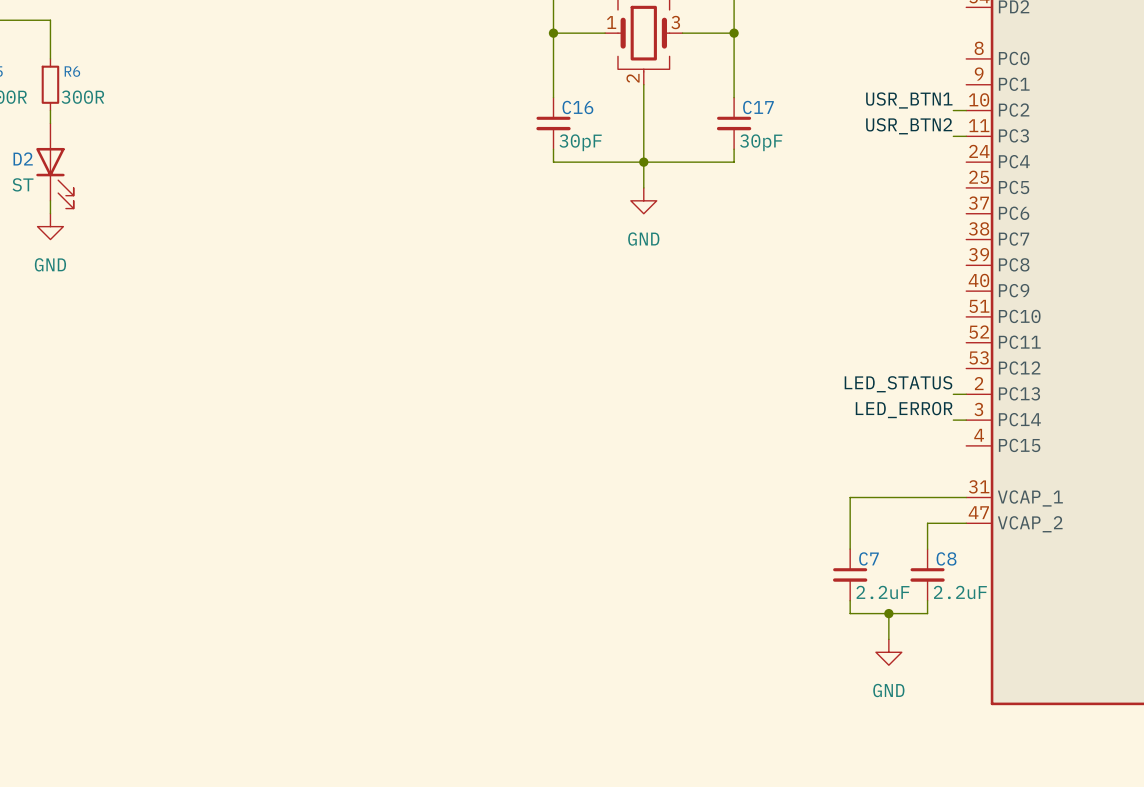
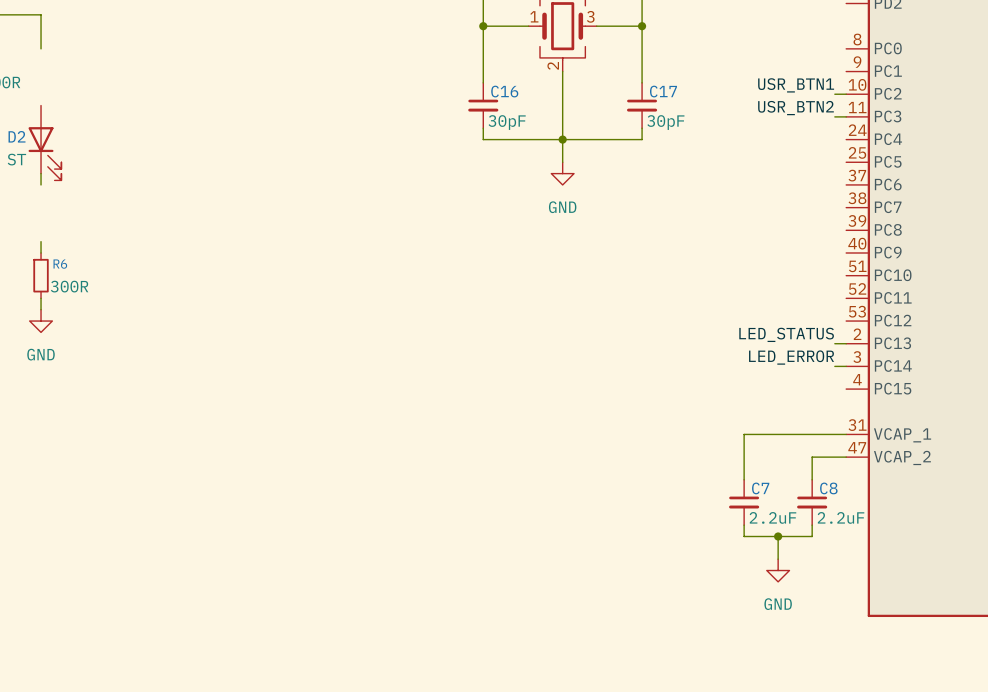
R6 position: (50, 84) -> (41, 275)
wire: (50, 110) (50, 123) -> (41, 241) (41, 252)
power symbol position: GND (50, 226) -> GND (41, 321)
wire: none -> (41, 298) (41, 309)

